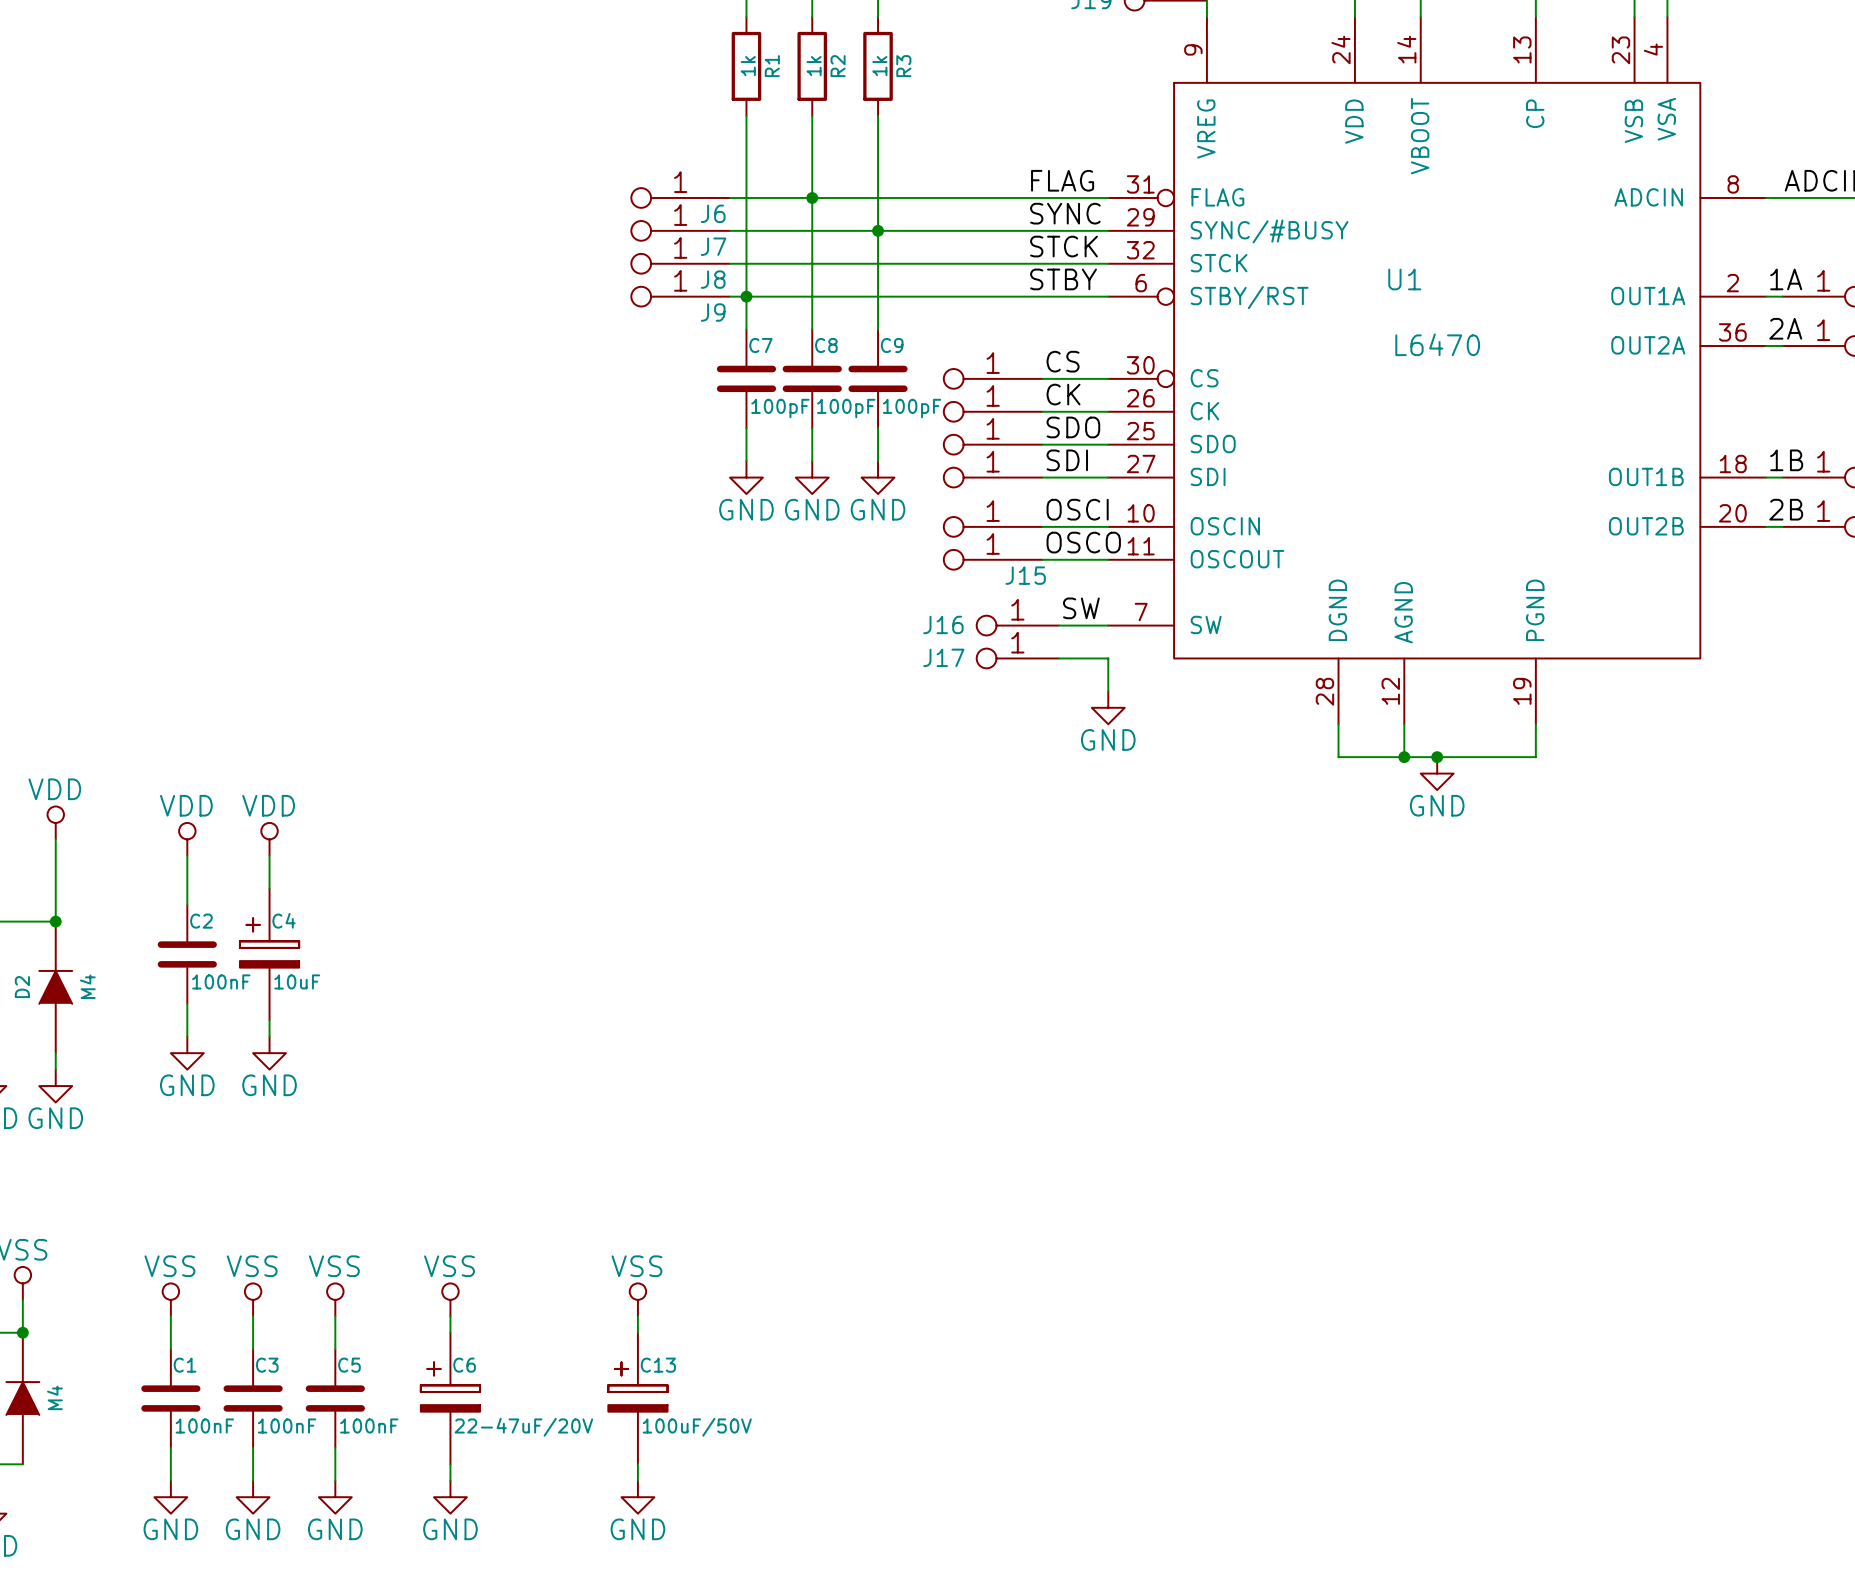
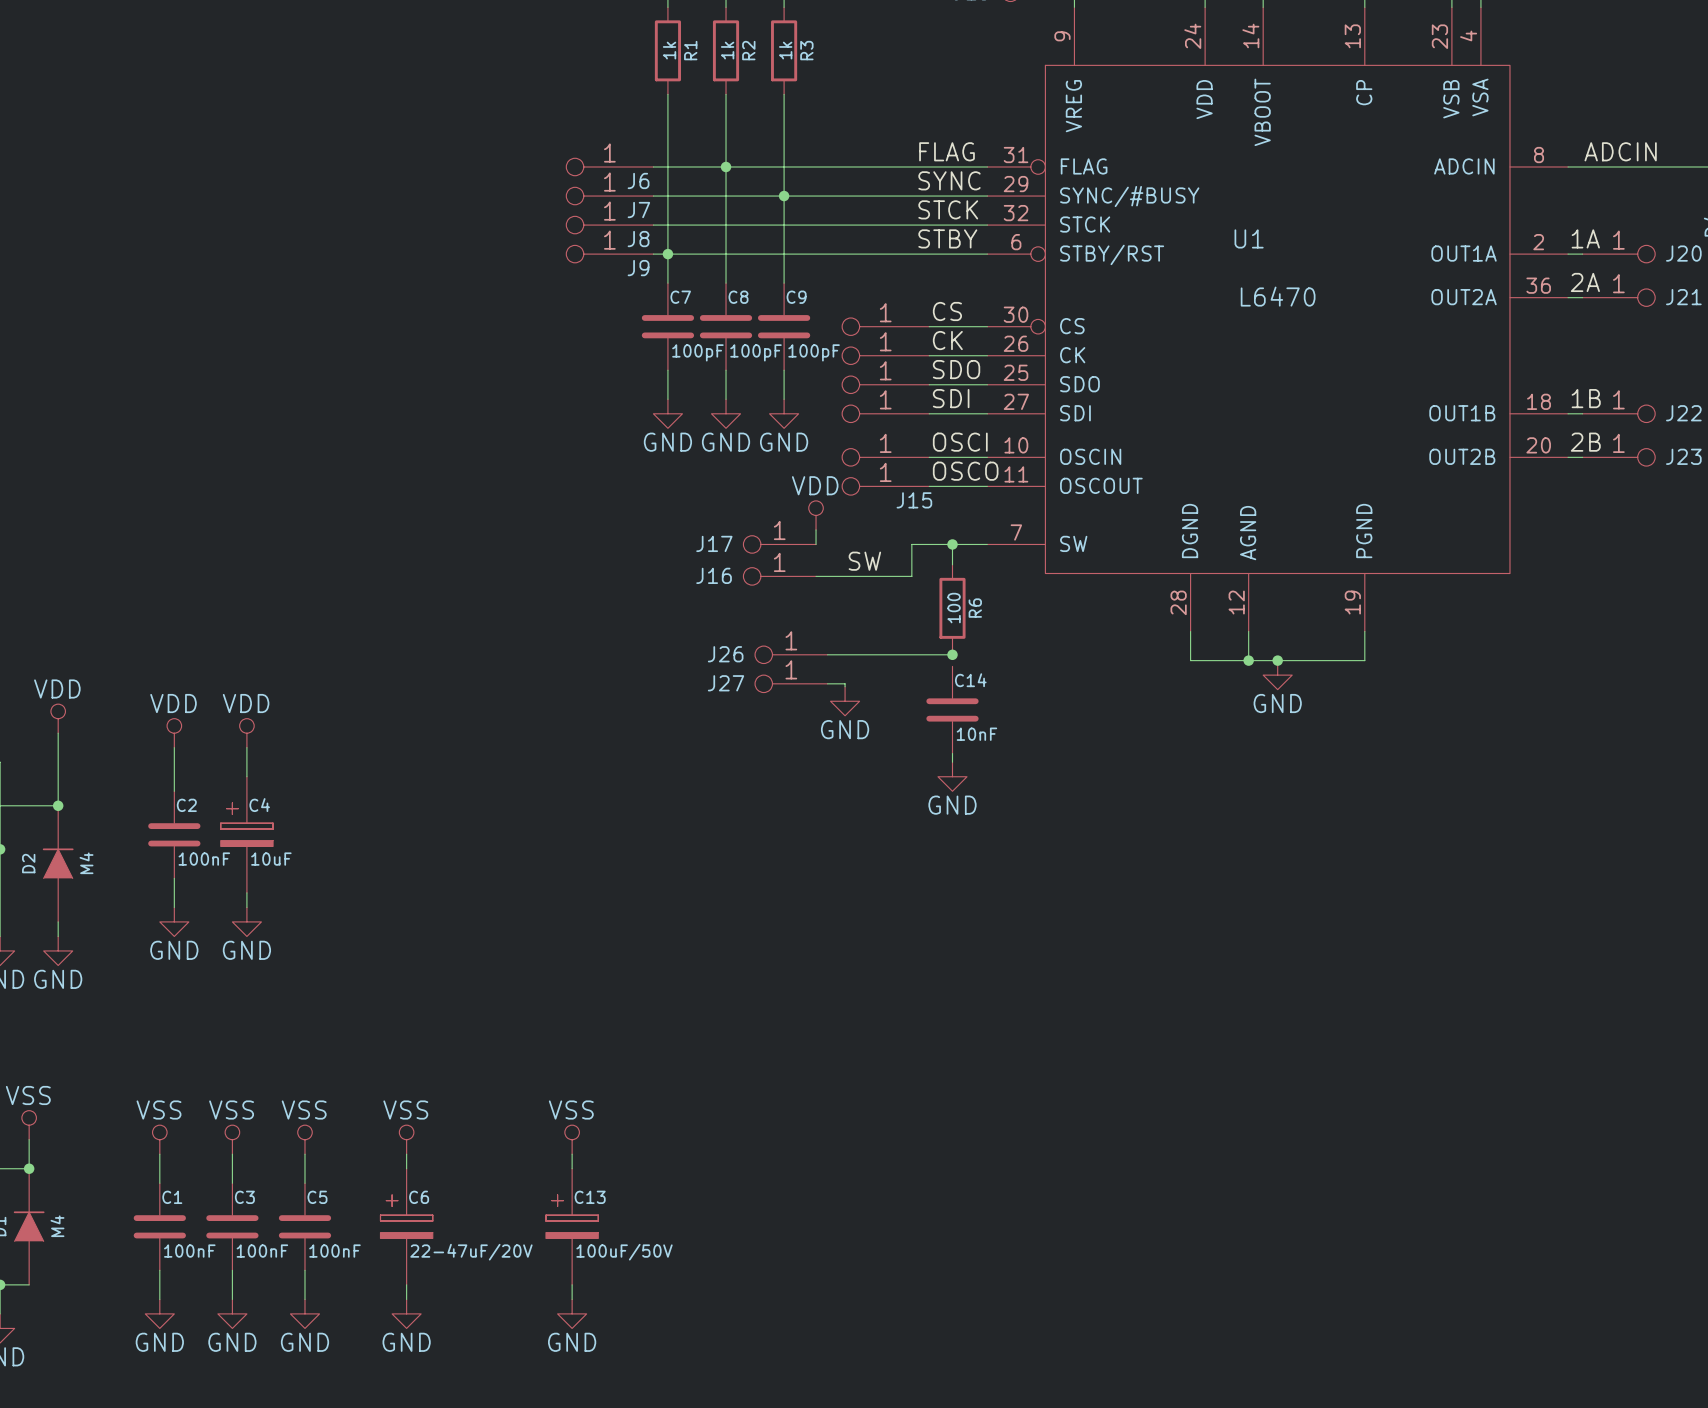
power symbol: none -> VDD (816, 515)
label position: SW (1081, 608) -> SW (864, 561)
wire: none -> (816, 529) (816, 544)
J16 position: (1017, 625) -> (779, 576)
wire: none -> (943, 544) (911, 544) (911, 576) (816, 576)
wire: none -> (952, 544) (952, 564)
junction: none -> (952, 544)
J17 position: (1017, 658) -> (779, 544)
wire: (1058, 658) (1108, 658) (1108, 691) -> none
R6: none -> 100 (952, 608)
power symbol: GND (1108, 707) -> none
J26: none -> (791, 654)
wire: none -> (827, 654) (952, 654)
junction: none -> (952, 654)
J27: none -> (791, 683)
wire: none -> (827, 683) (845, 683) (845, 686)
power symbol: none -> GND (845, 701)
C14: none -> 10nF (952, 709)
wire: none -> (952, 753) (952, 762)
power symbol: none -> GND (952, 776)

